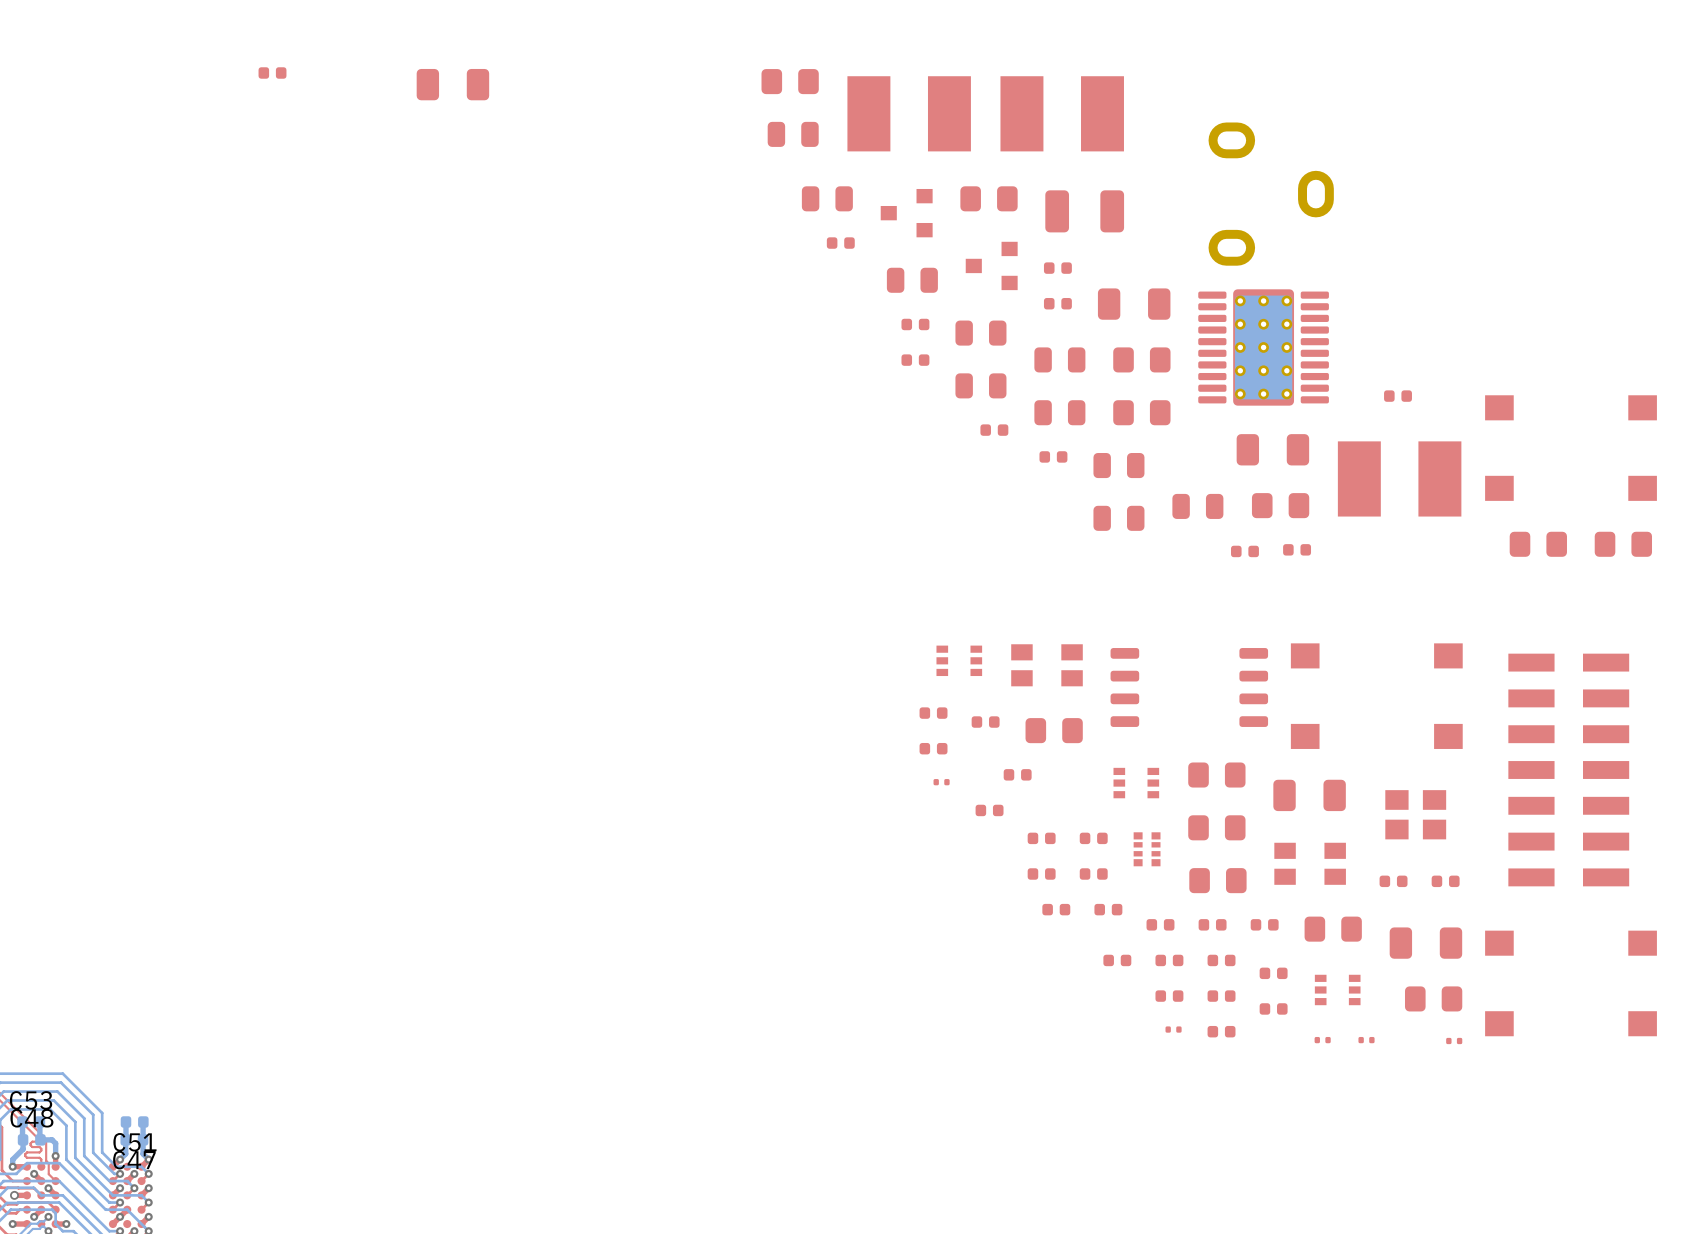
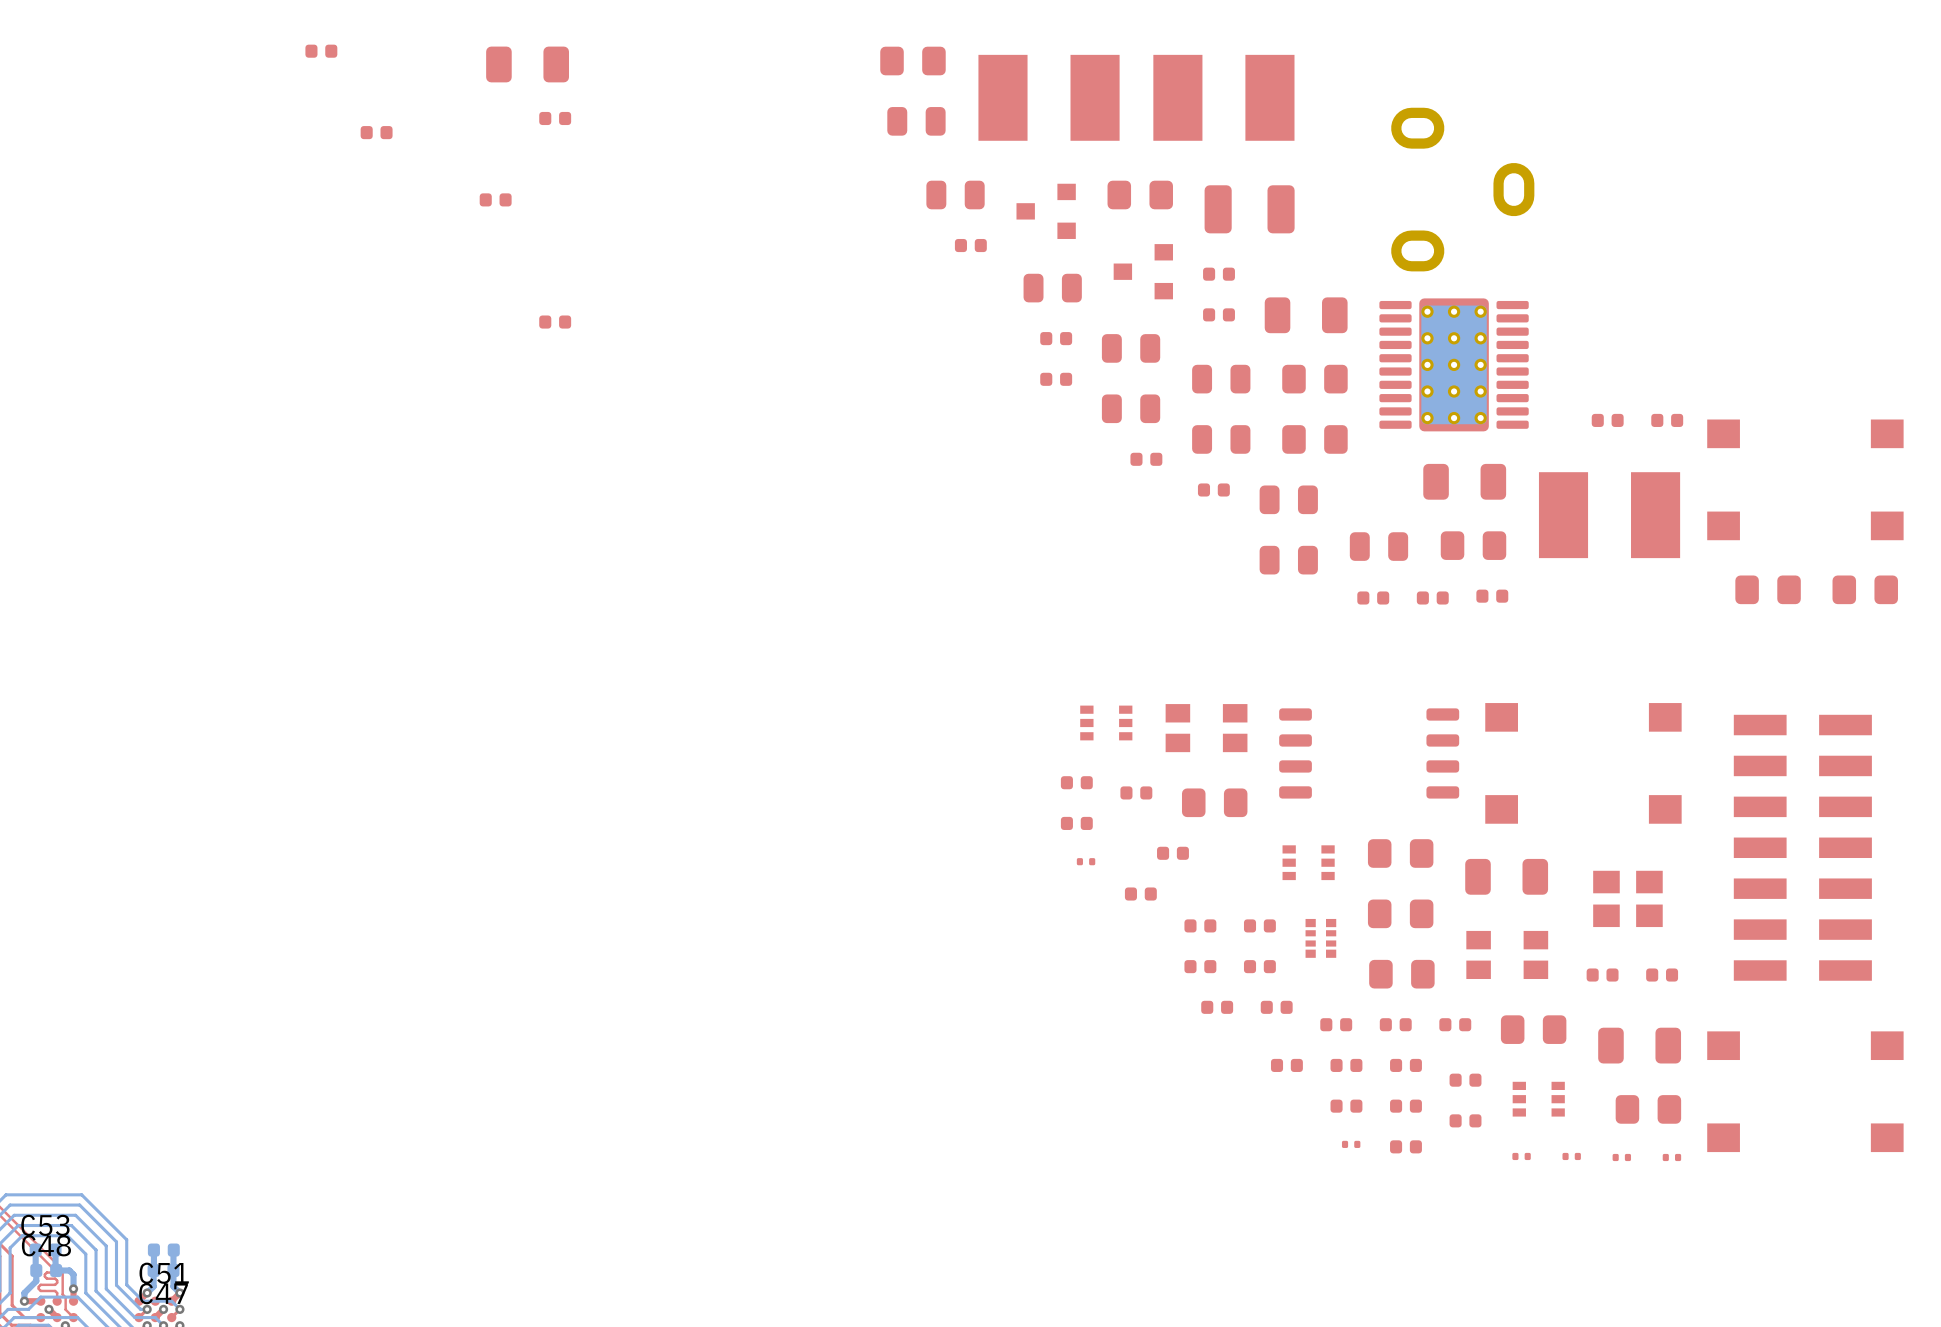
part: none -> (555, 118)
part: none -> (376, 132)
part: none -> (495, 199)
part: none -> (555, 322)
part: none -> (1667, 420)
part: none -> (1373, 597)
part: none -> (1621, 1157)

